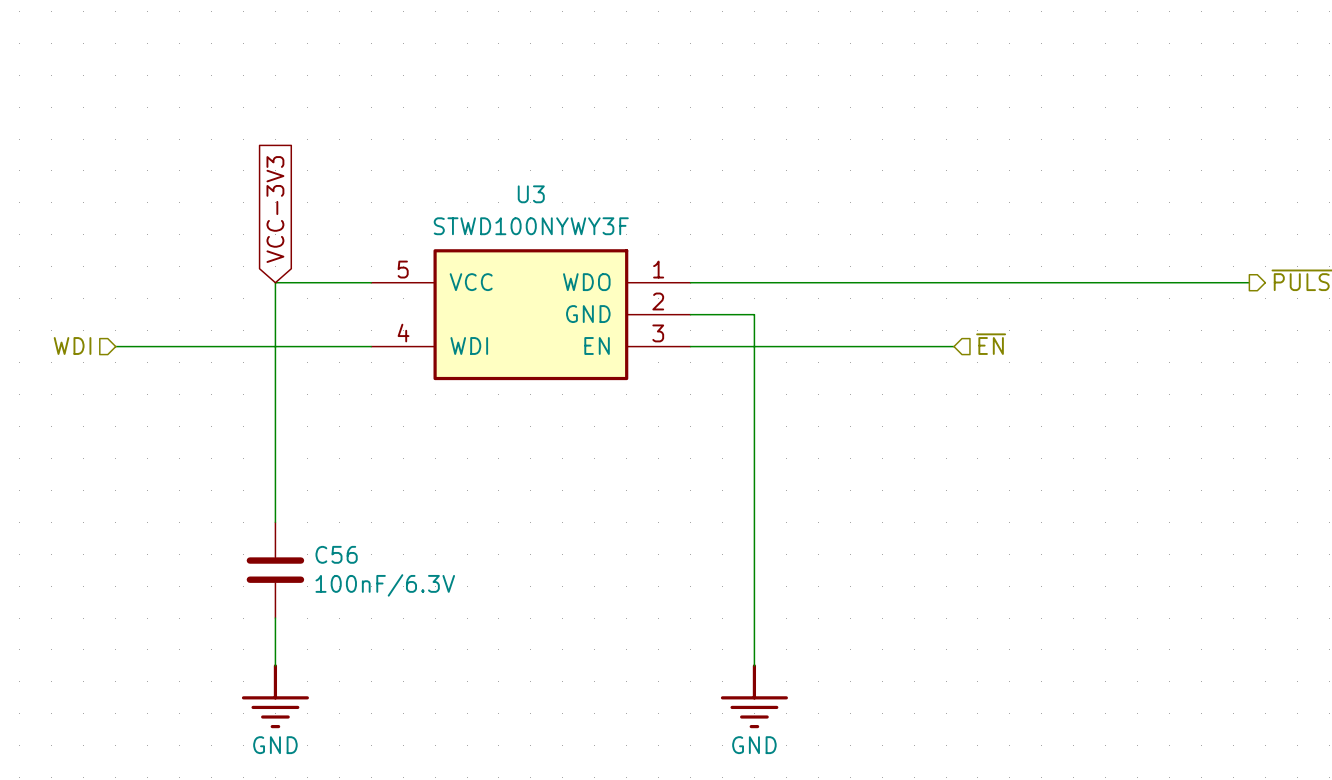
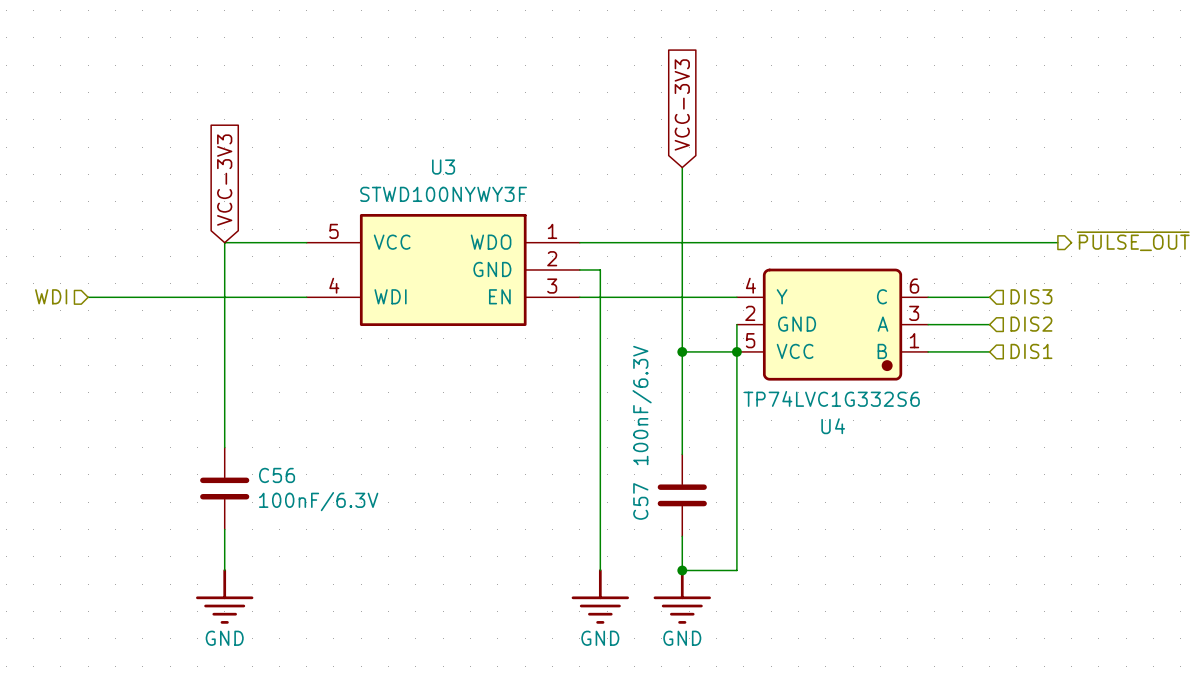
global label: none -> VCC-3V3 (682, 104)
wire: none -> (682, 167) (682, 454)
wire: (714, 314) (754, 314) (754, 665) -> (600, 269) (600, 570)
hierarchical label: ~{EN} (991, 344) -> none
hierarchical label: none -> DIS3 (1031, 296)
wire: none -> (928, 297) (989, 297)
hierarchical label: none -> DIS2 (1031, 324)
wire: none -> (736, 324) (736, 570) (682, 570) (682, 536)
U4: none -> TP74LVC1G332S6 (832, 324)
wire: none -> (928, 324) (989, 324)
hierarchical label: none -> DIS1 (1031, 351)
wire: none -> (682, 351) (736, 351)
junction: none -> (682, 351)
junction: none -> (736, 351)
wire: none -> (928, 351) (989, 351)
C57: none -> 100nF/6.3V (682, 495)
junction: none -> (682, 570)
power symbol: none -> GND (600, 596)
power symbol: GND (754, 696) -> none
power symbol: none -> GND (682, 596)

